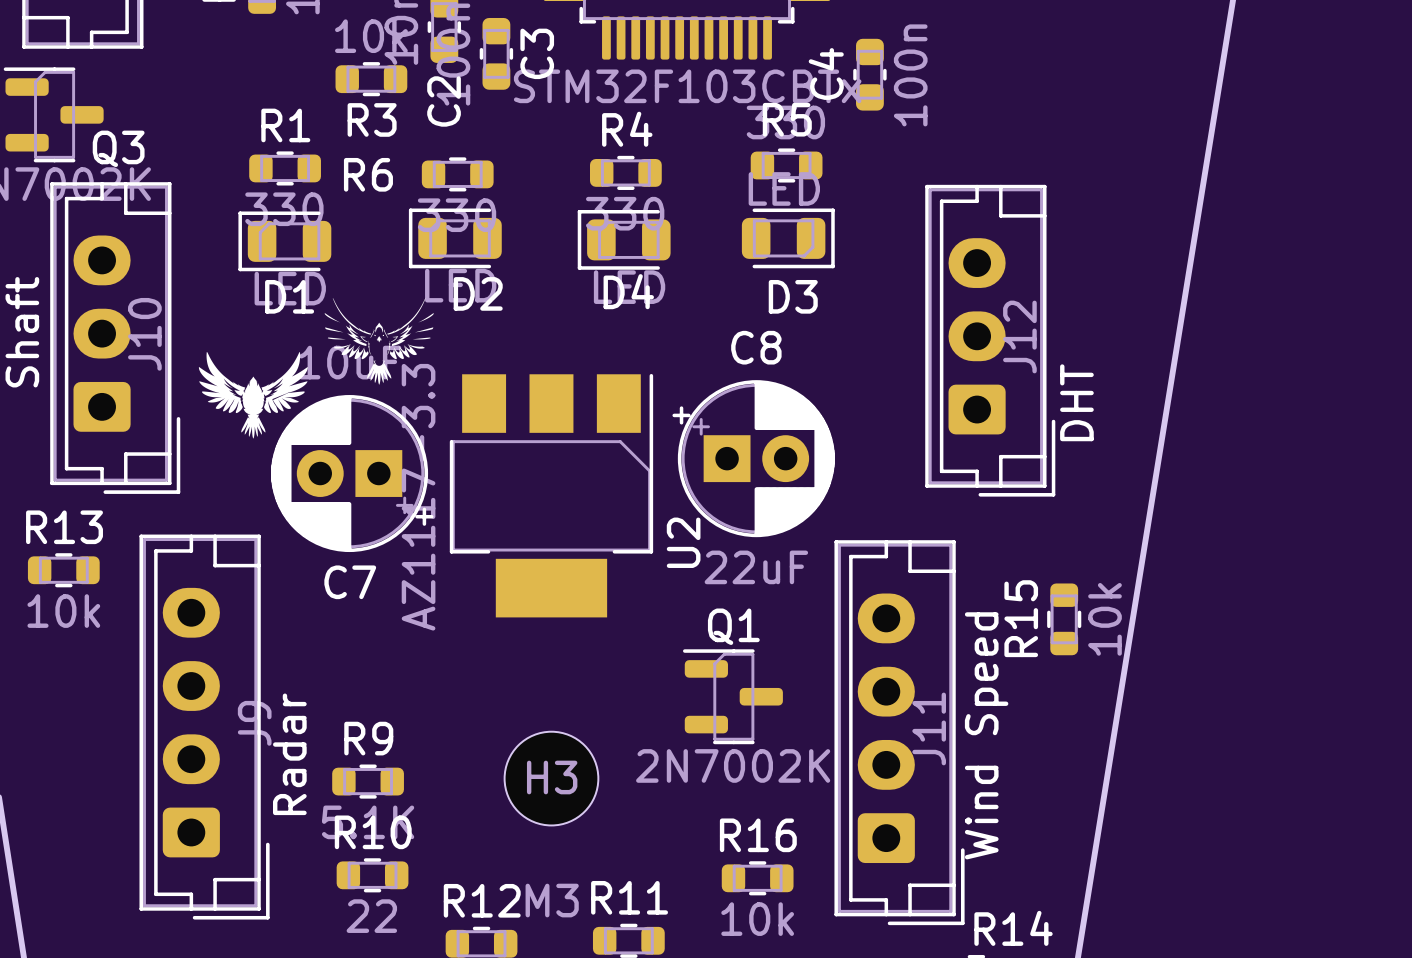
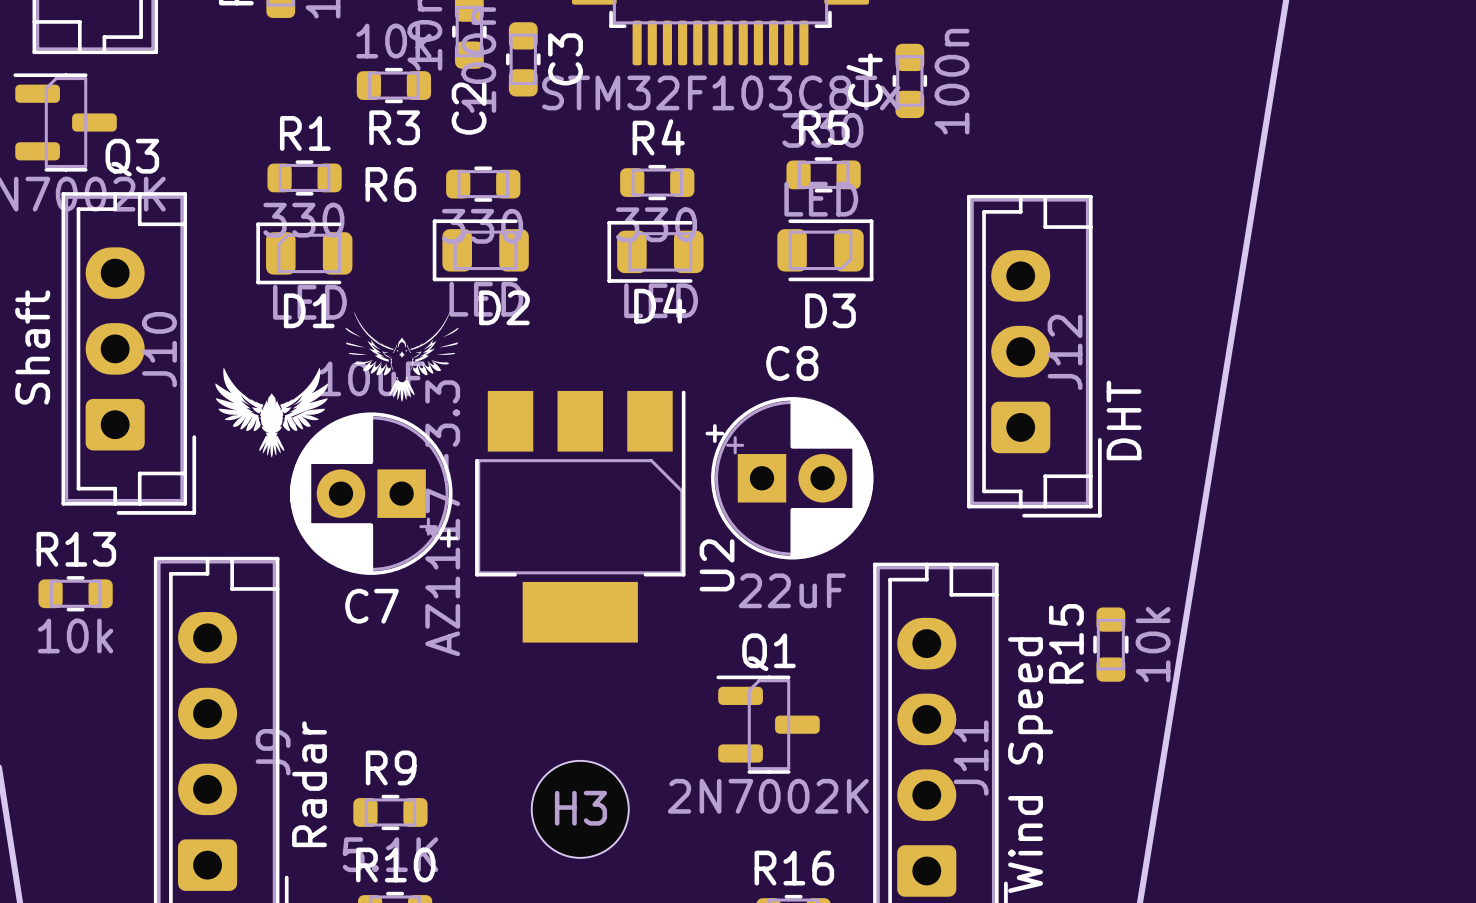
part value: STM32F103CBTx (687, 86) -> STM32F103C8Tx (721, 92)

